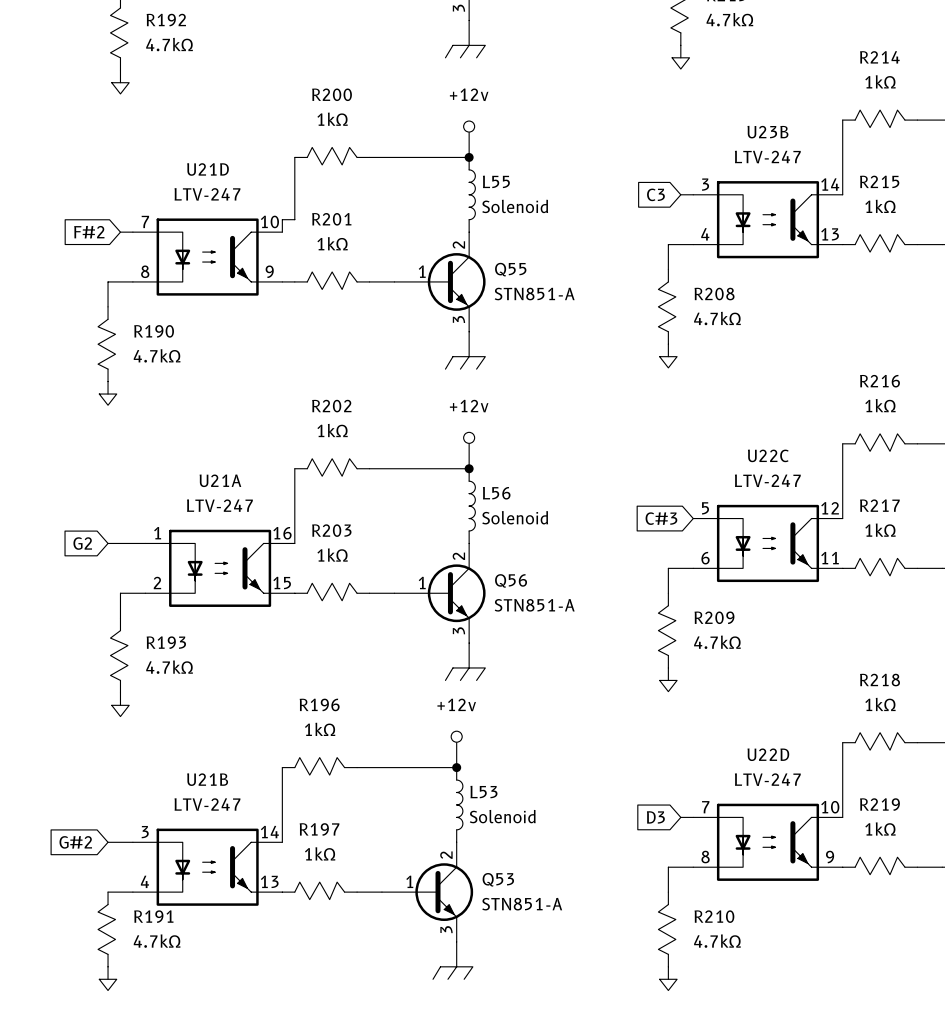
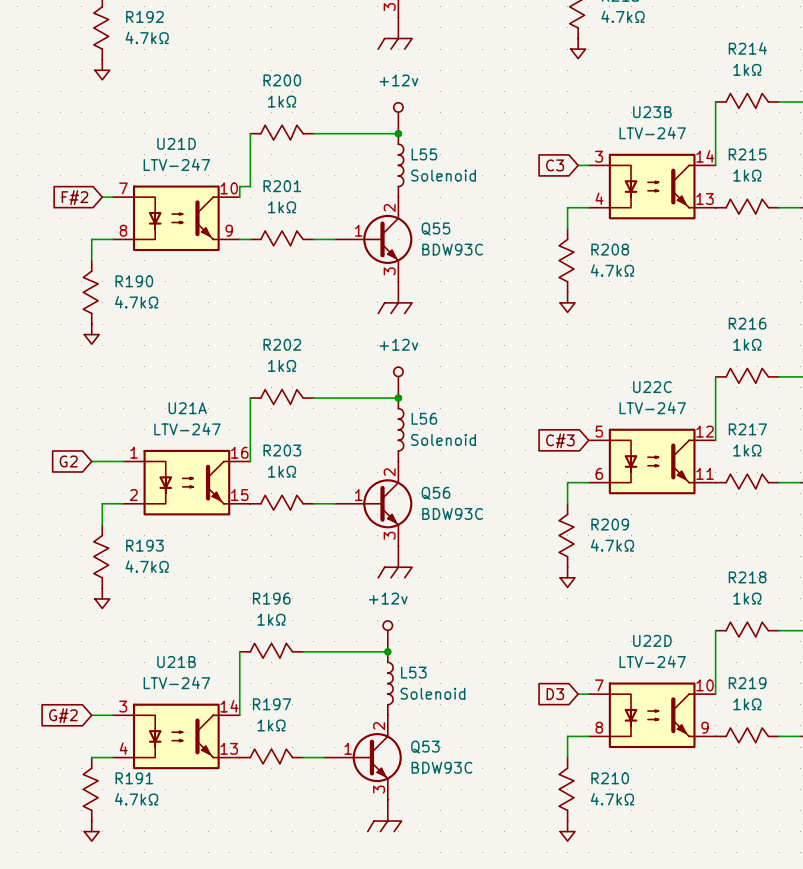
Q55 value: STN851-A (534, 294) -> BDW93C (452, 249)
Q56 value: STN851-A (534, 605) -> BDW93C (452, 513)
Q53 value: STN851-A (522, 904) -> BDW93C (442, 767)

